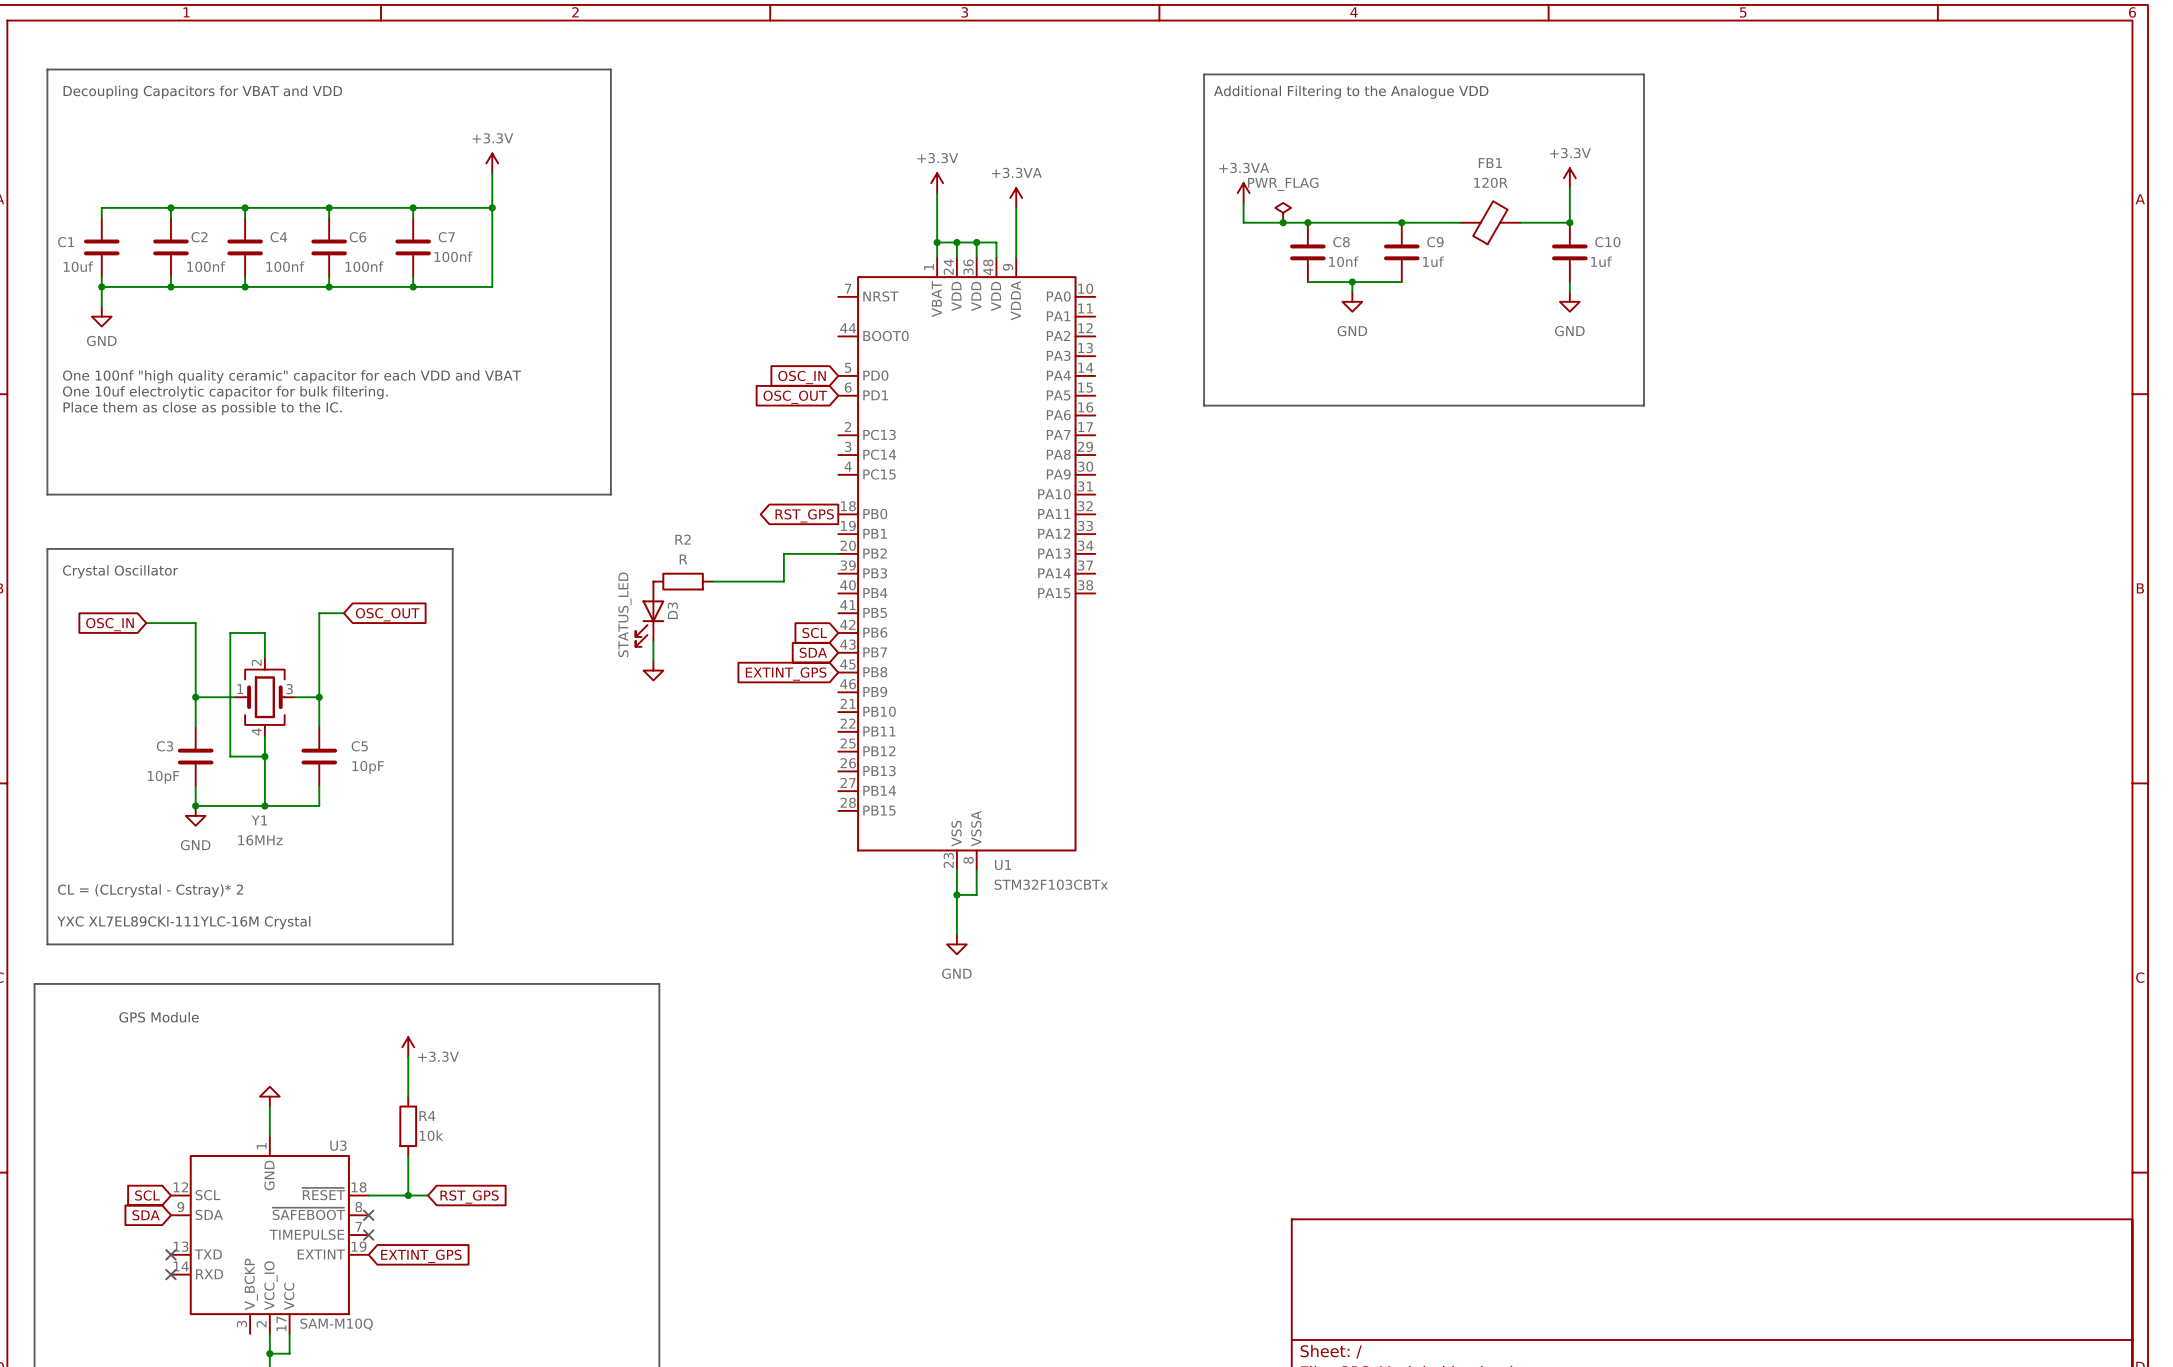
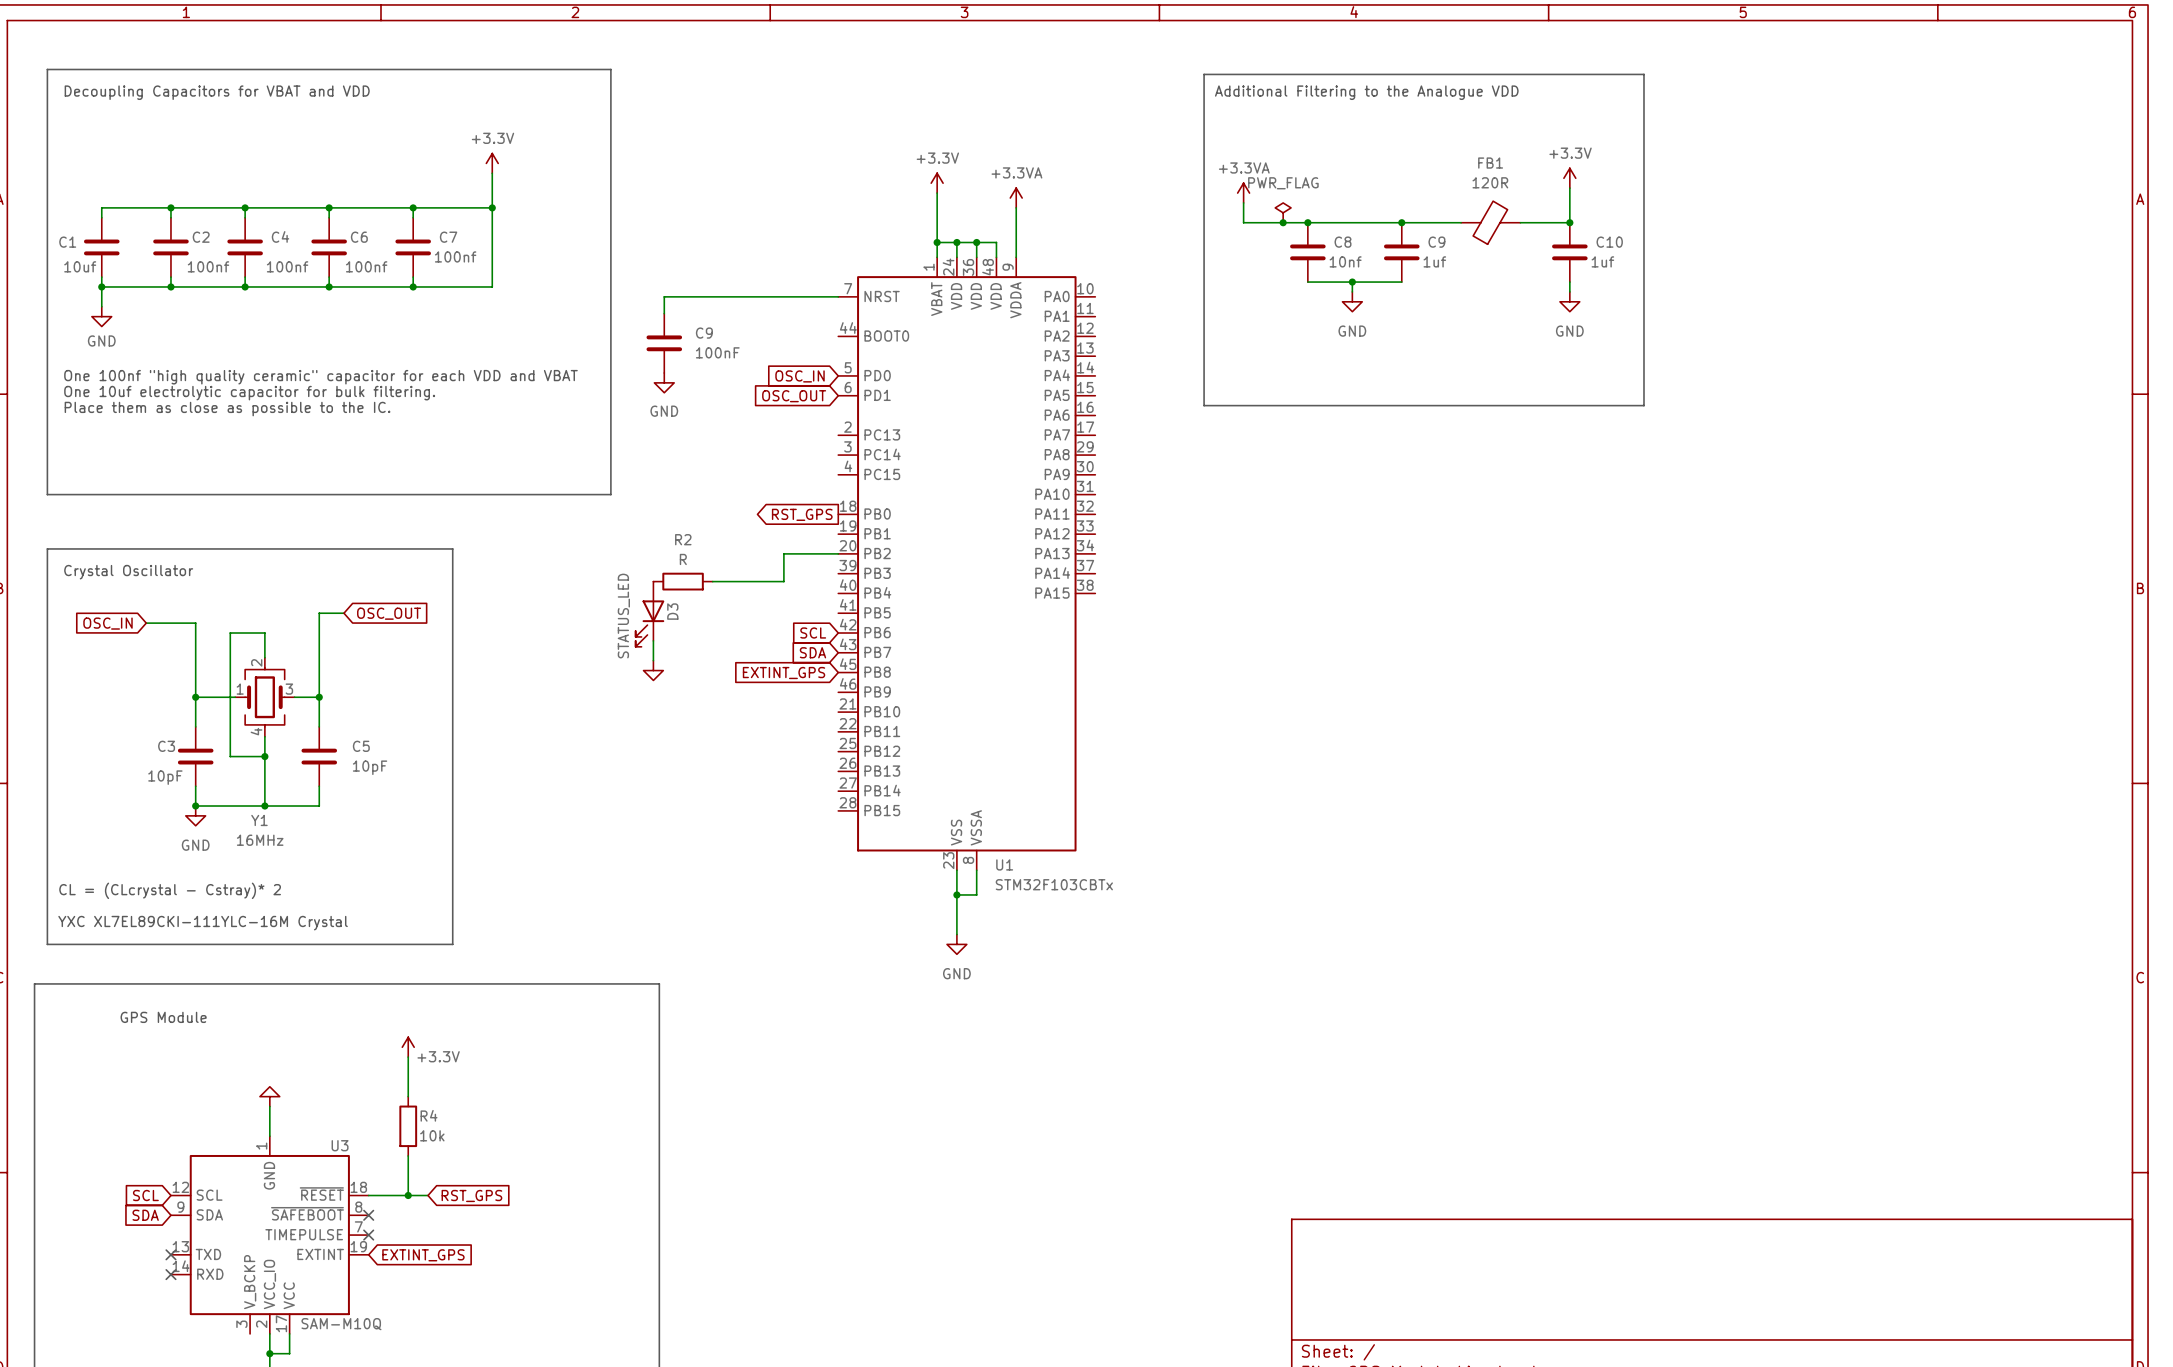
wire: none -> (838, 296) (664, 296) (664, 313)
C9: none -> 100nF (664, 343)
power symbol: none -> GND (664, 382)

